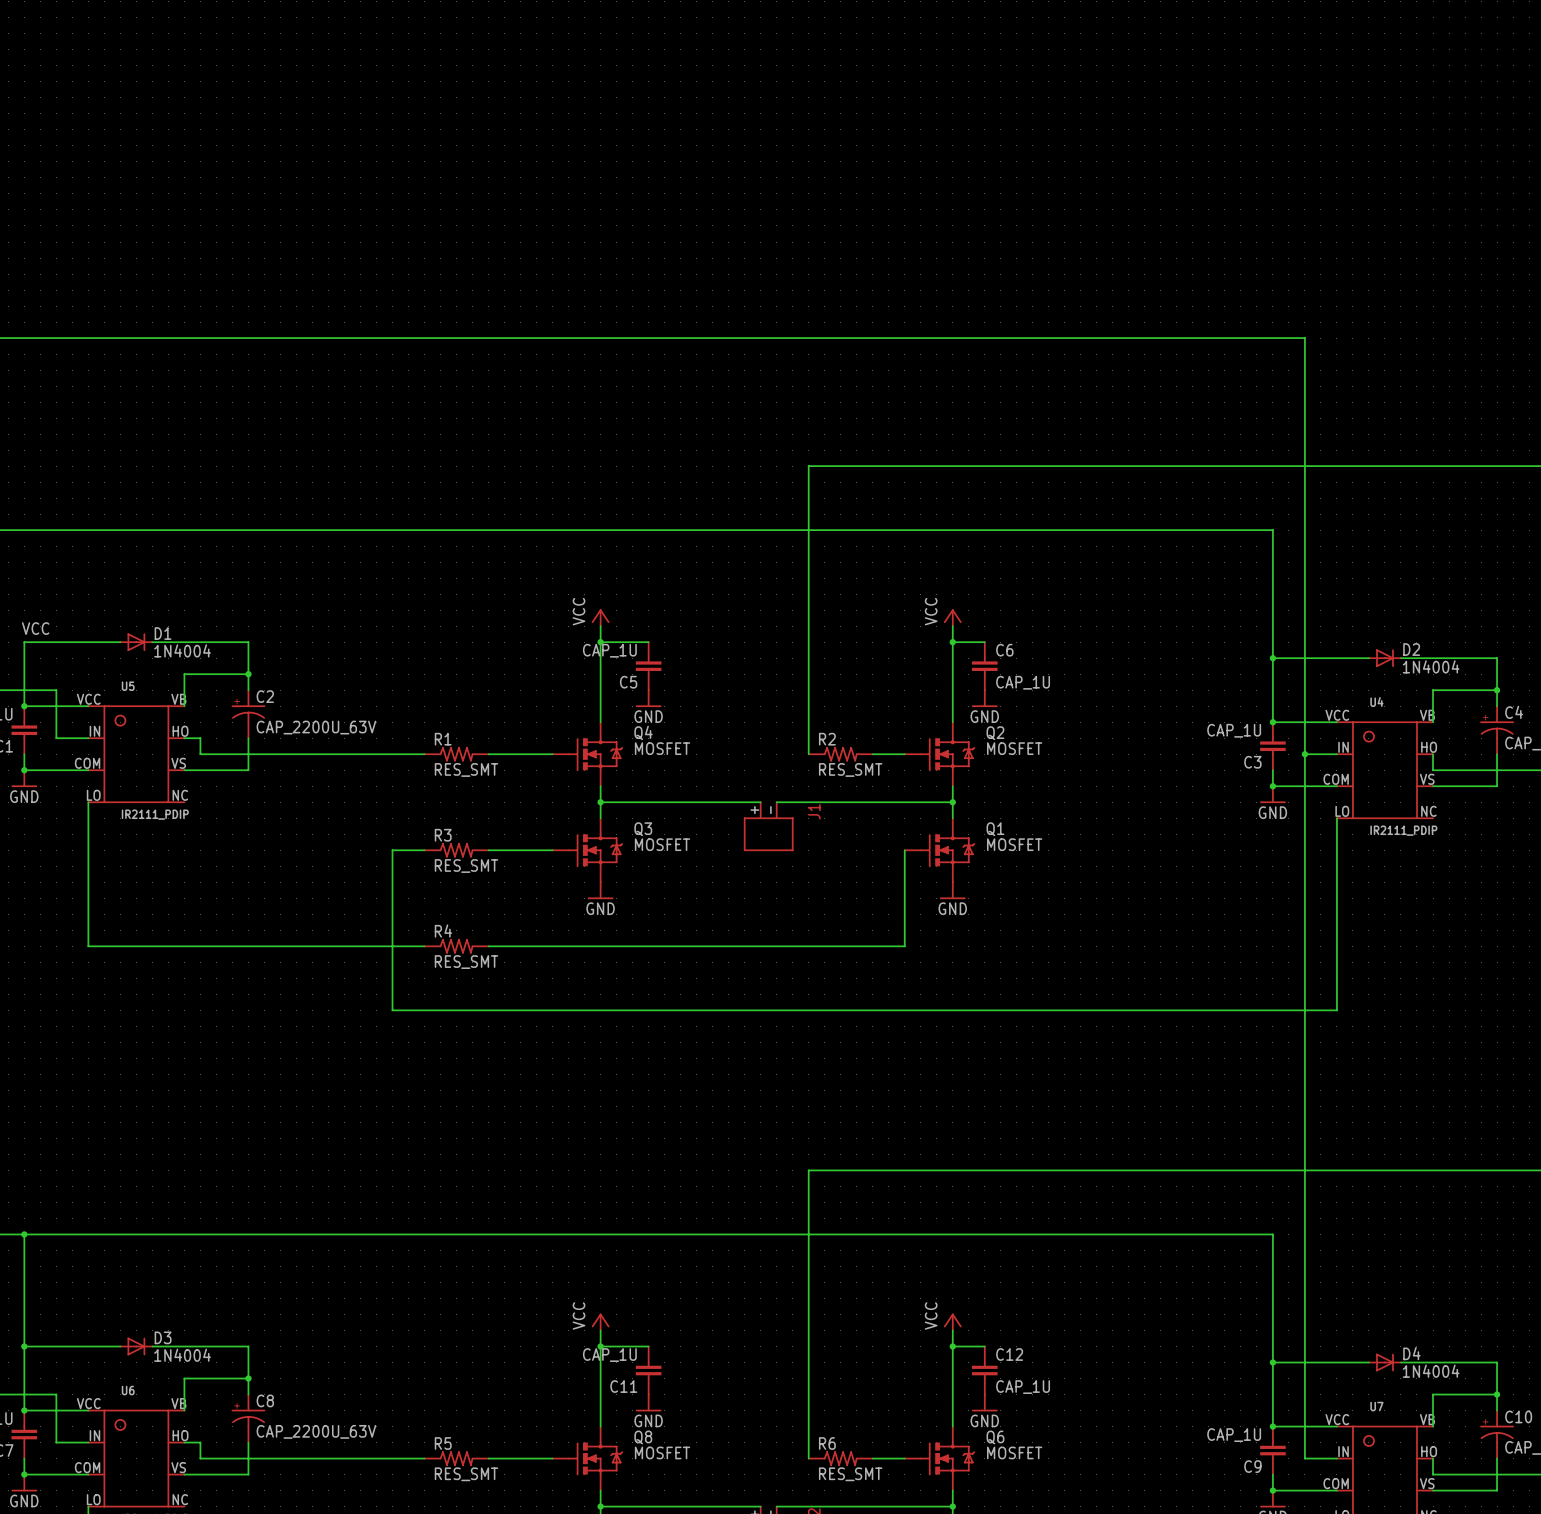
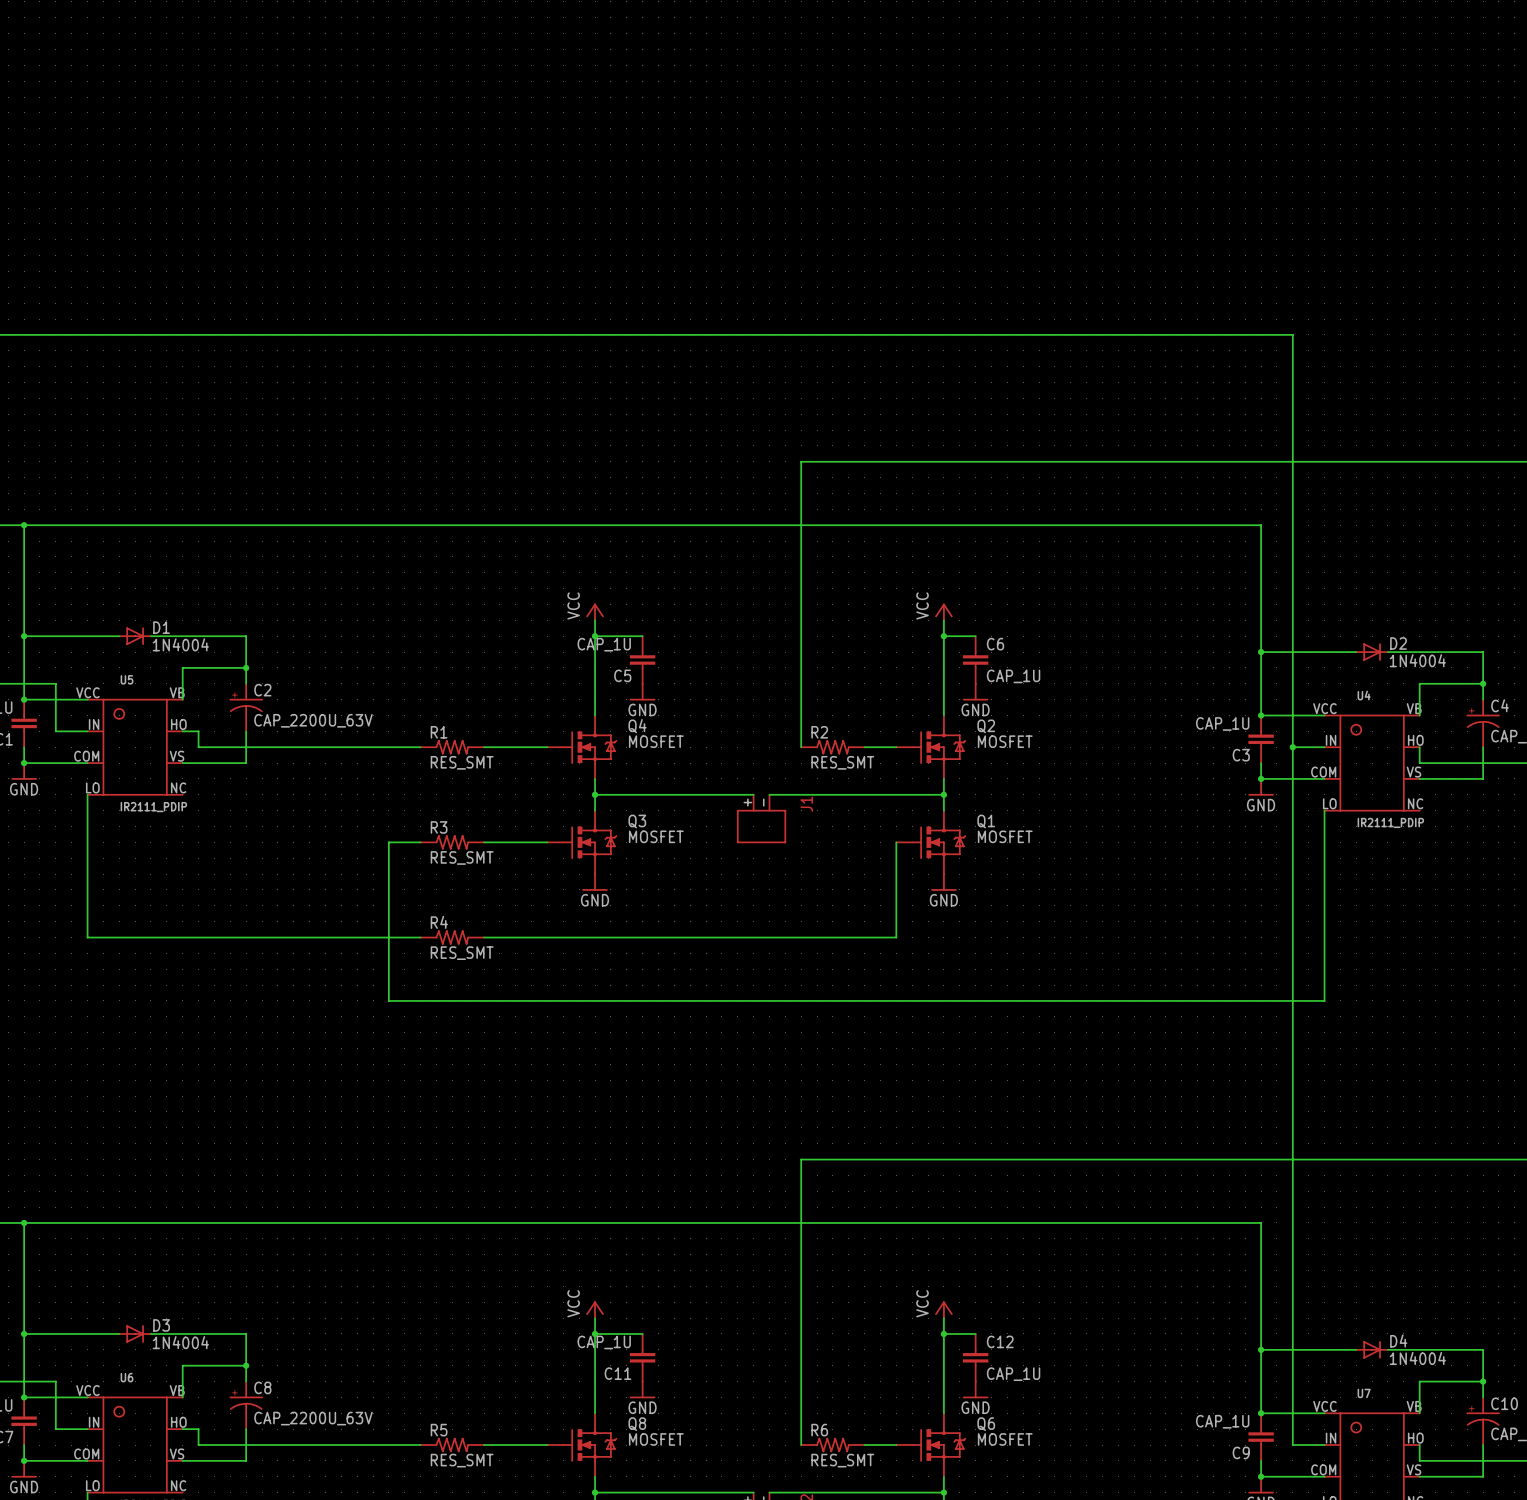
wire: none -> (24, 525) (24, 636)
junction: none -> (24, 525)
label: VCC (35, 628) -> none
junction: none -> (24, 636)

